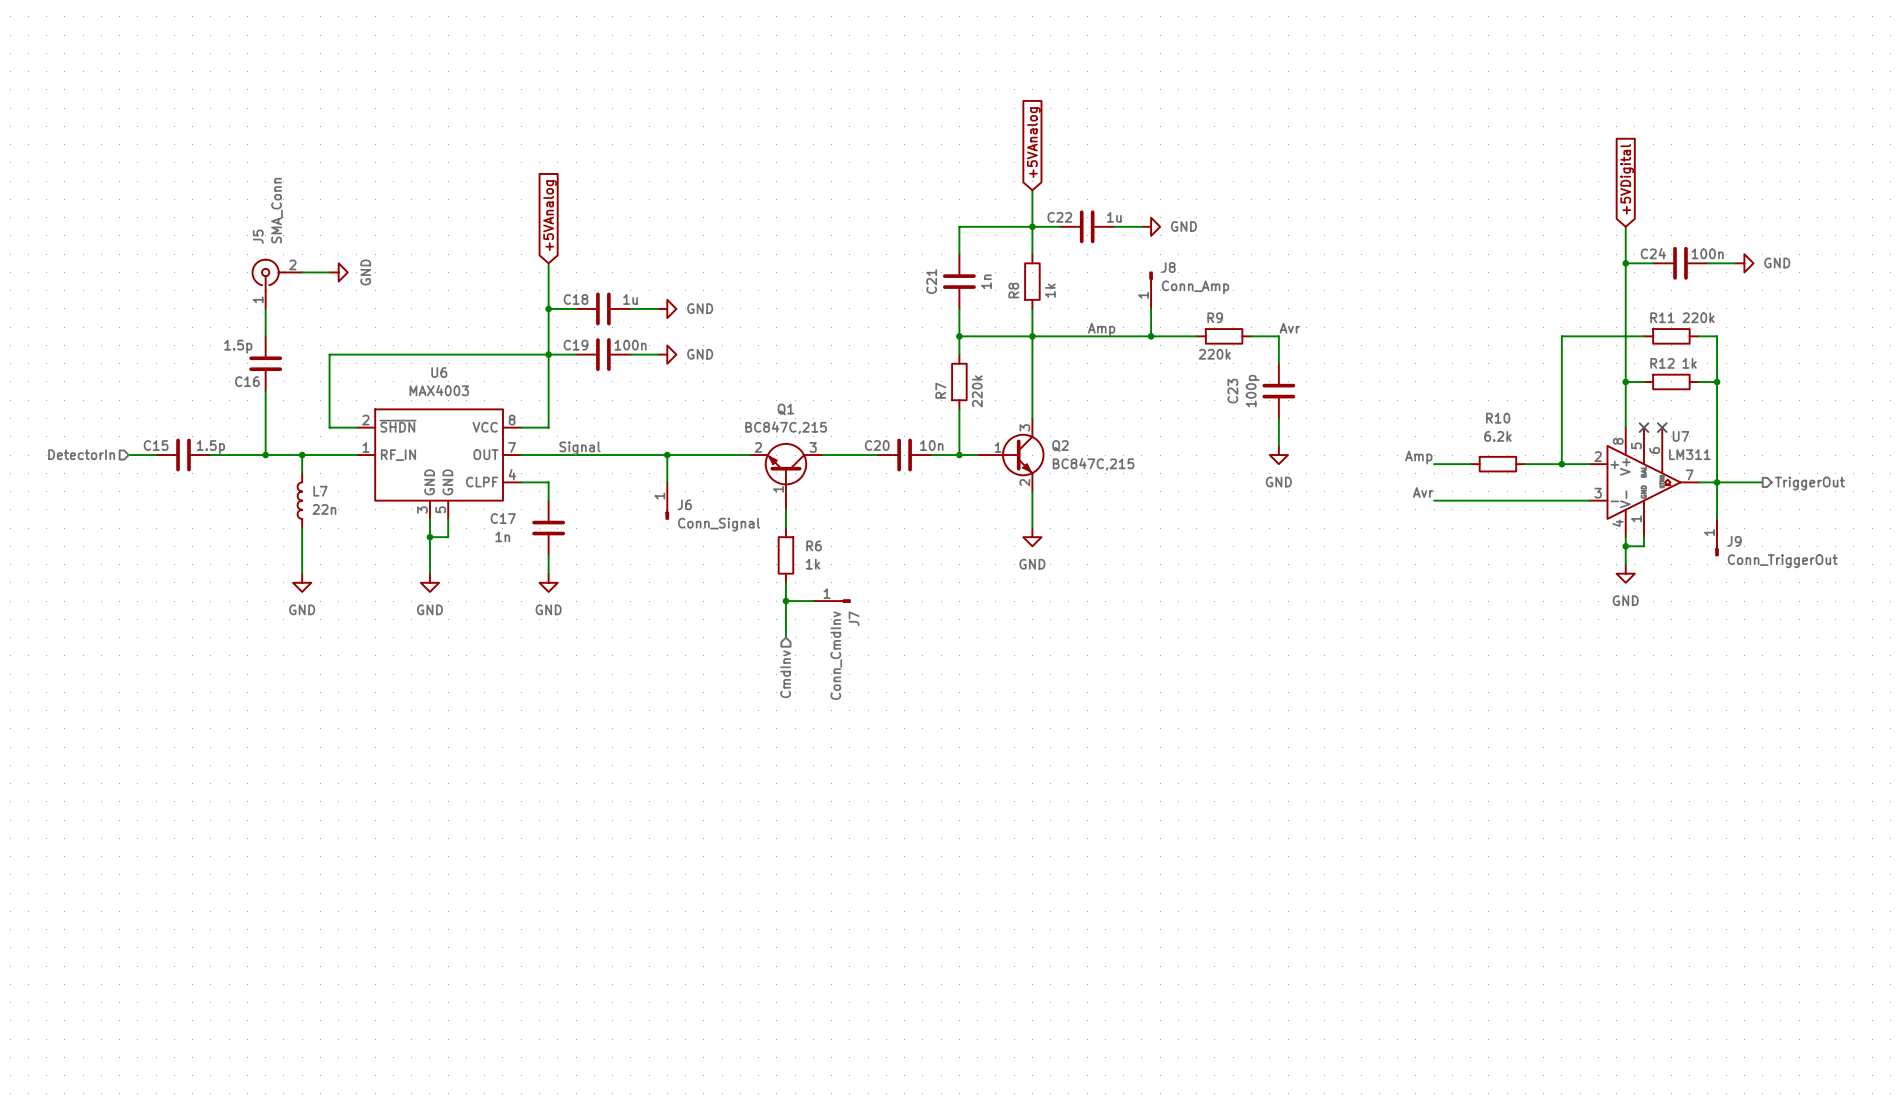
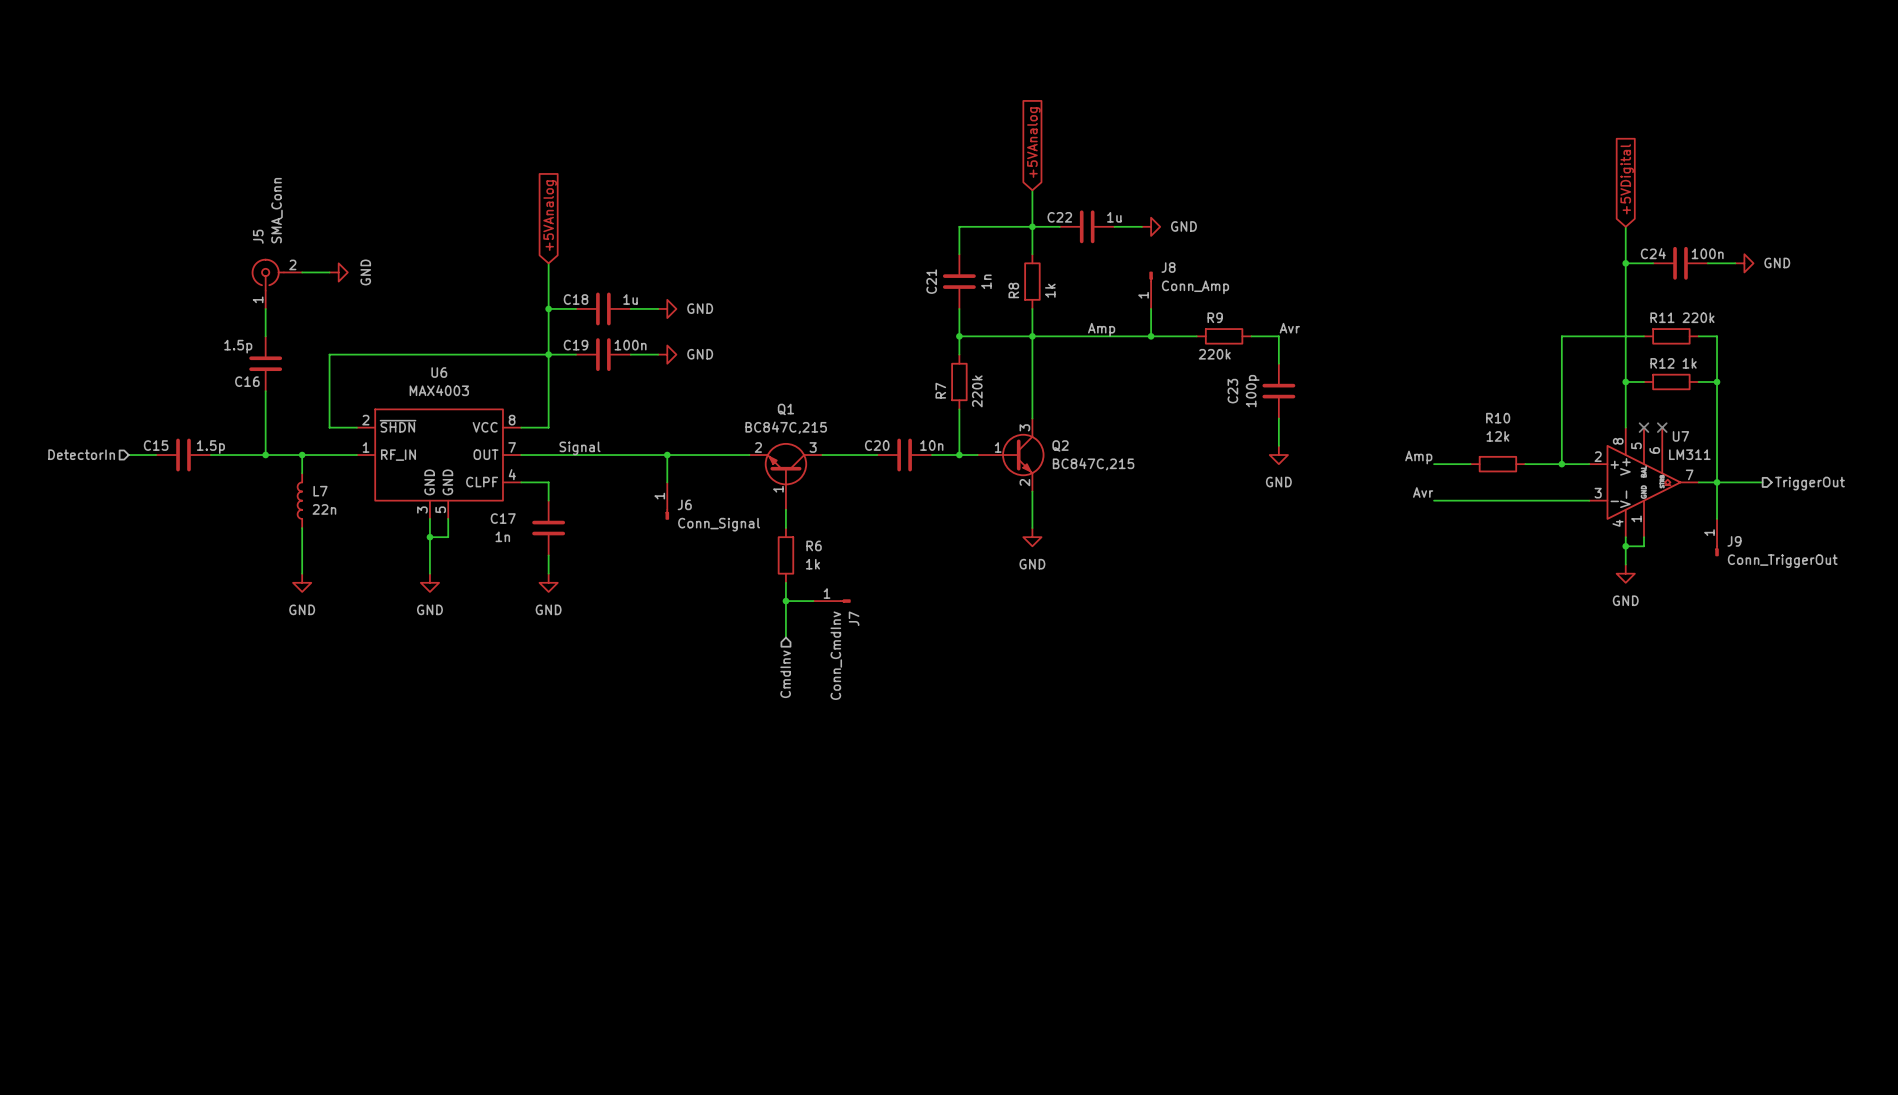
R10 value: 6.2k (1497, 436) -> 12k (1497, 436)

